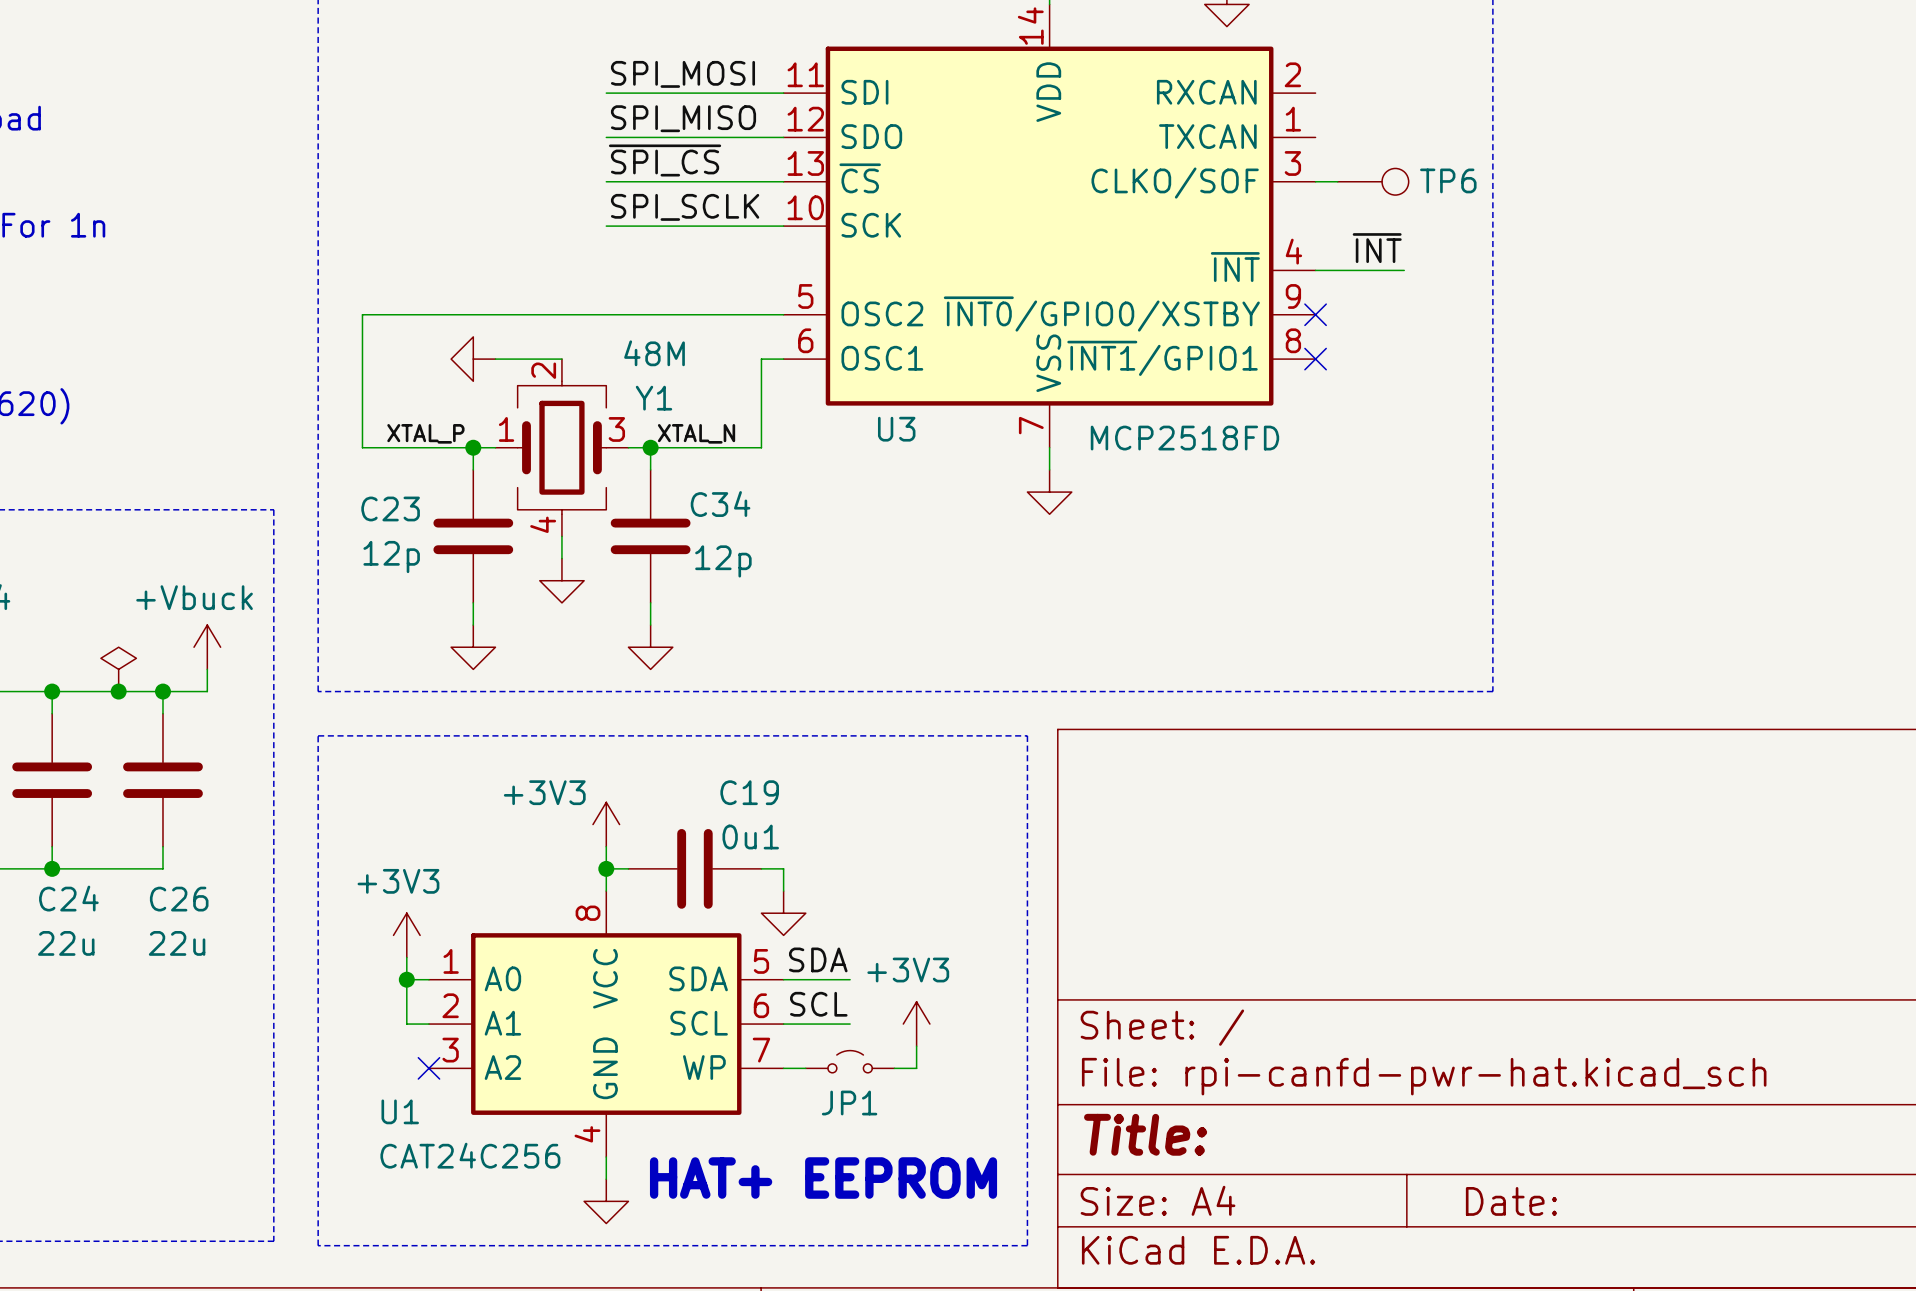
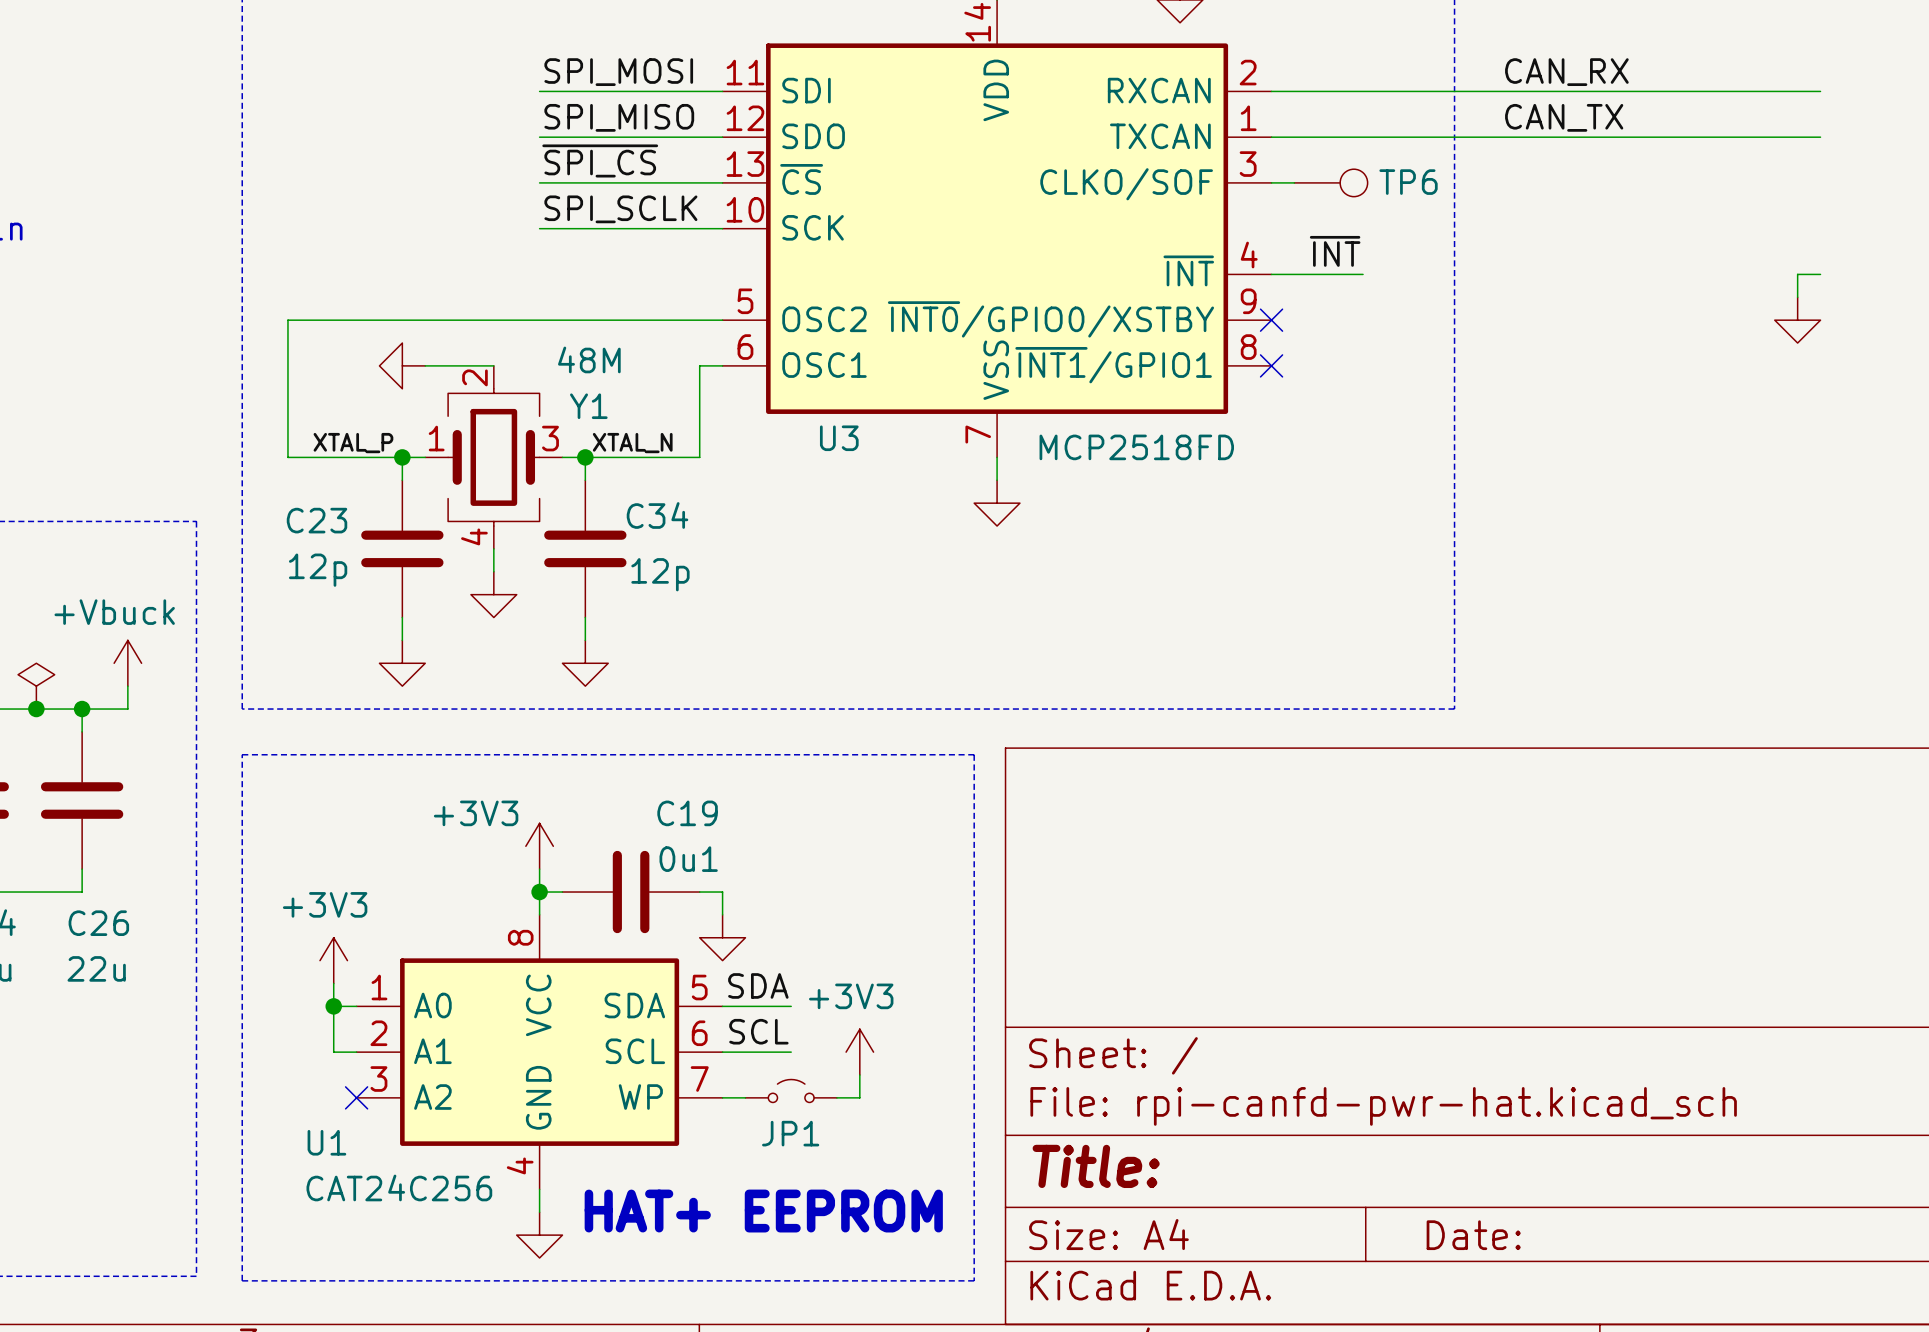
label: none -> CAN_RX (1566, 72)
wire: none -> (1271, 91) (1820, 91)
label: none -> CAN_TX (1564, 117)
wire: none -> (1271, 137) (1820, 137)
wire: none -> (1820, 274) (1797, 274) (1797, 297)
power symbol: none -> (1797, 320)

